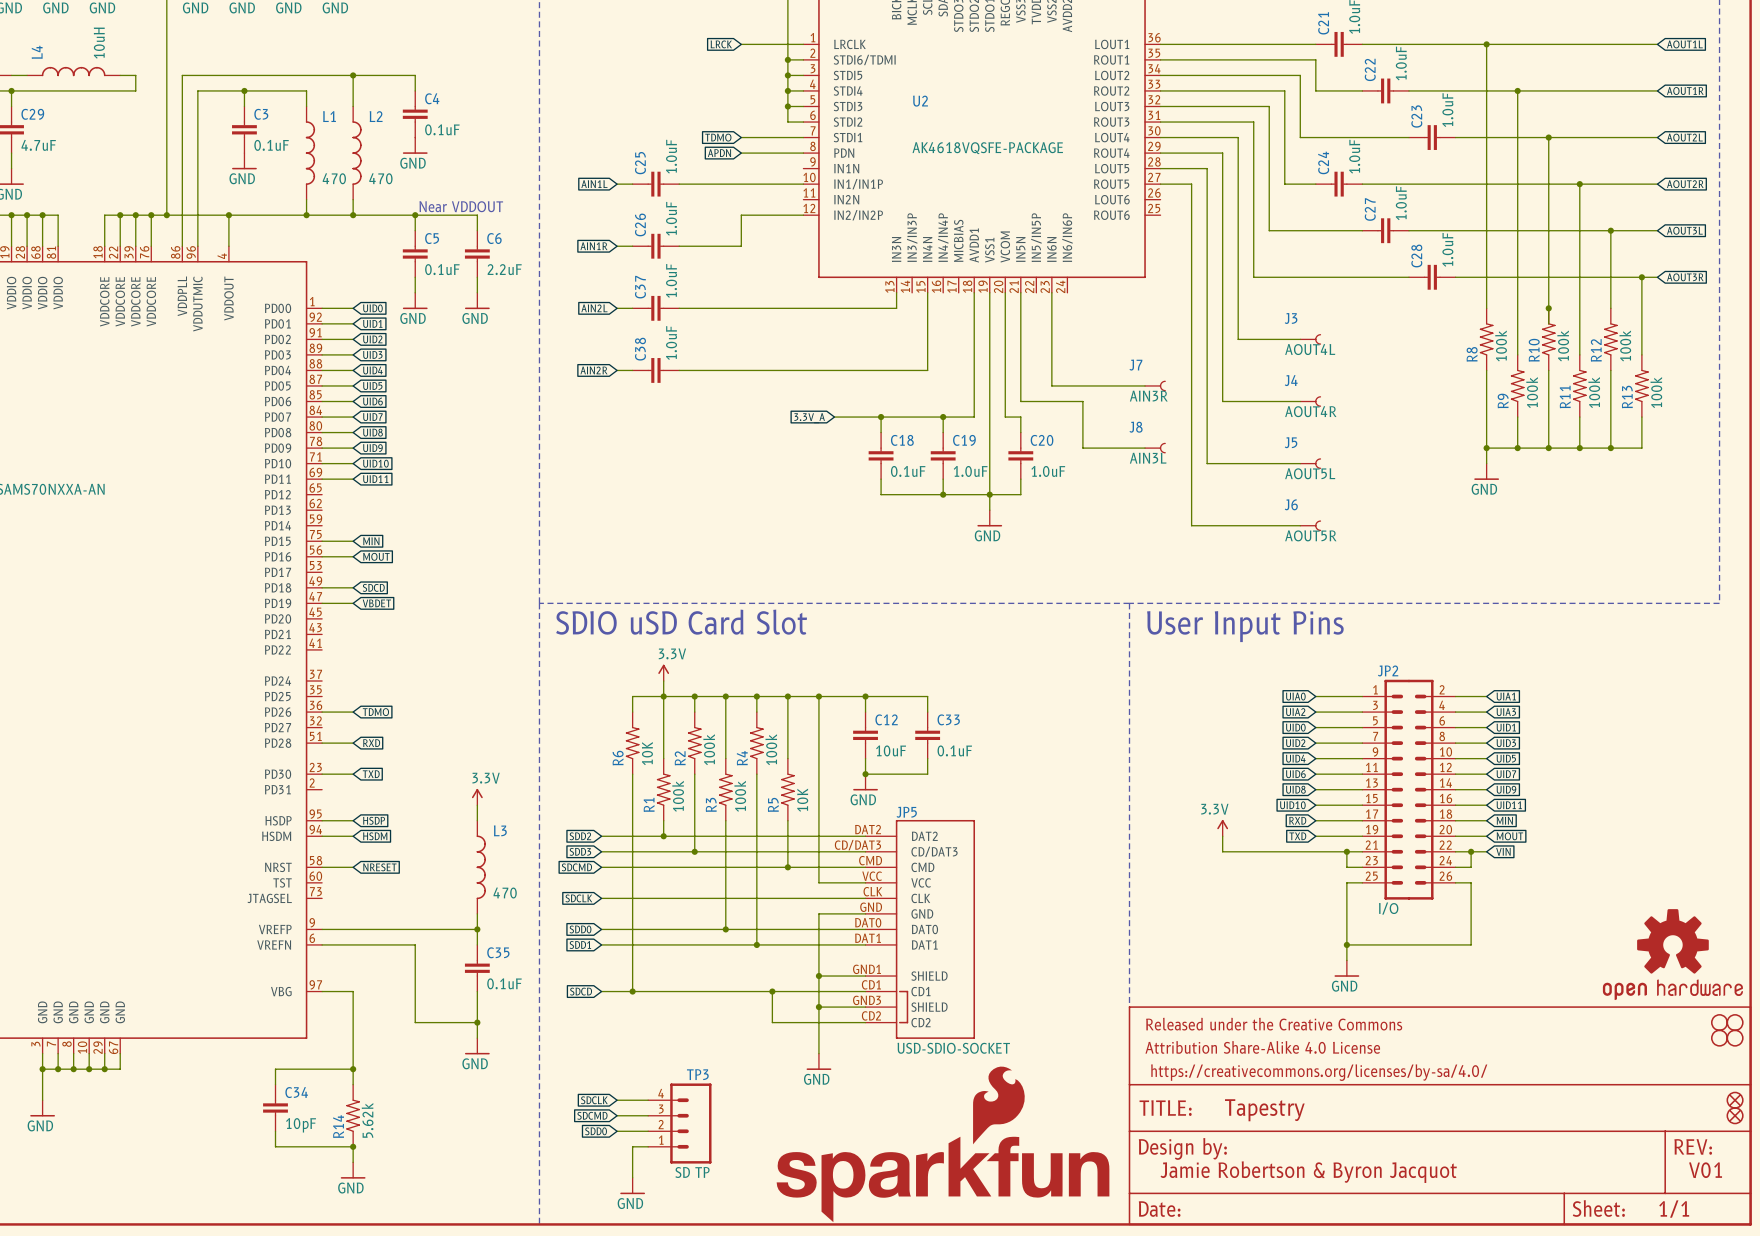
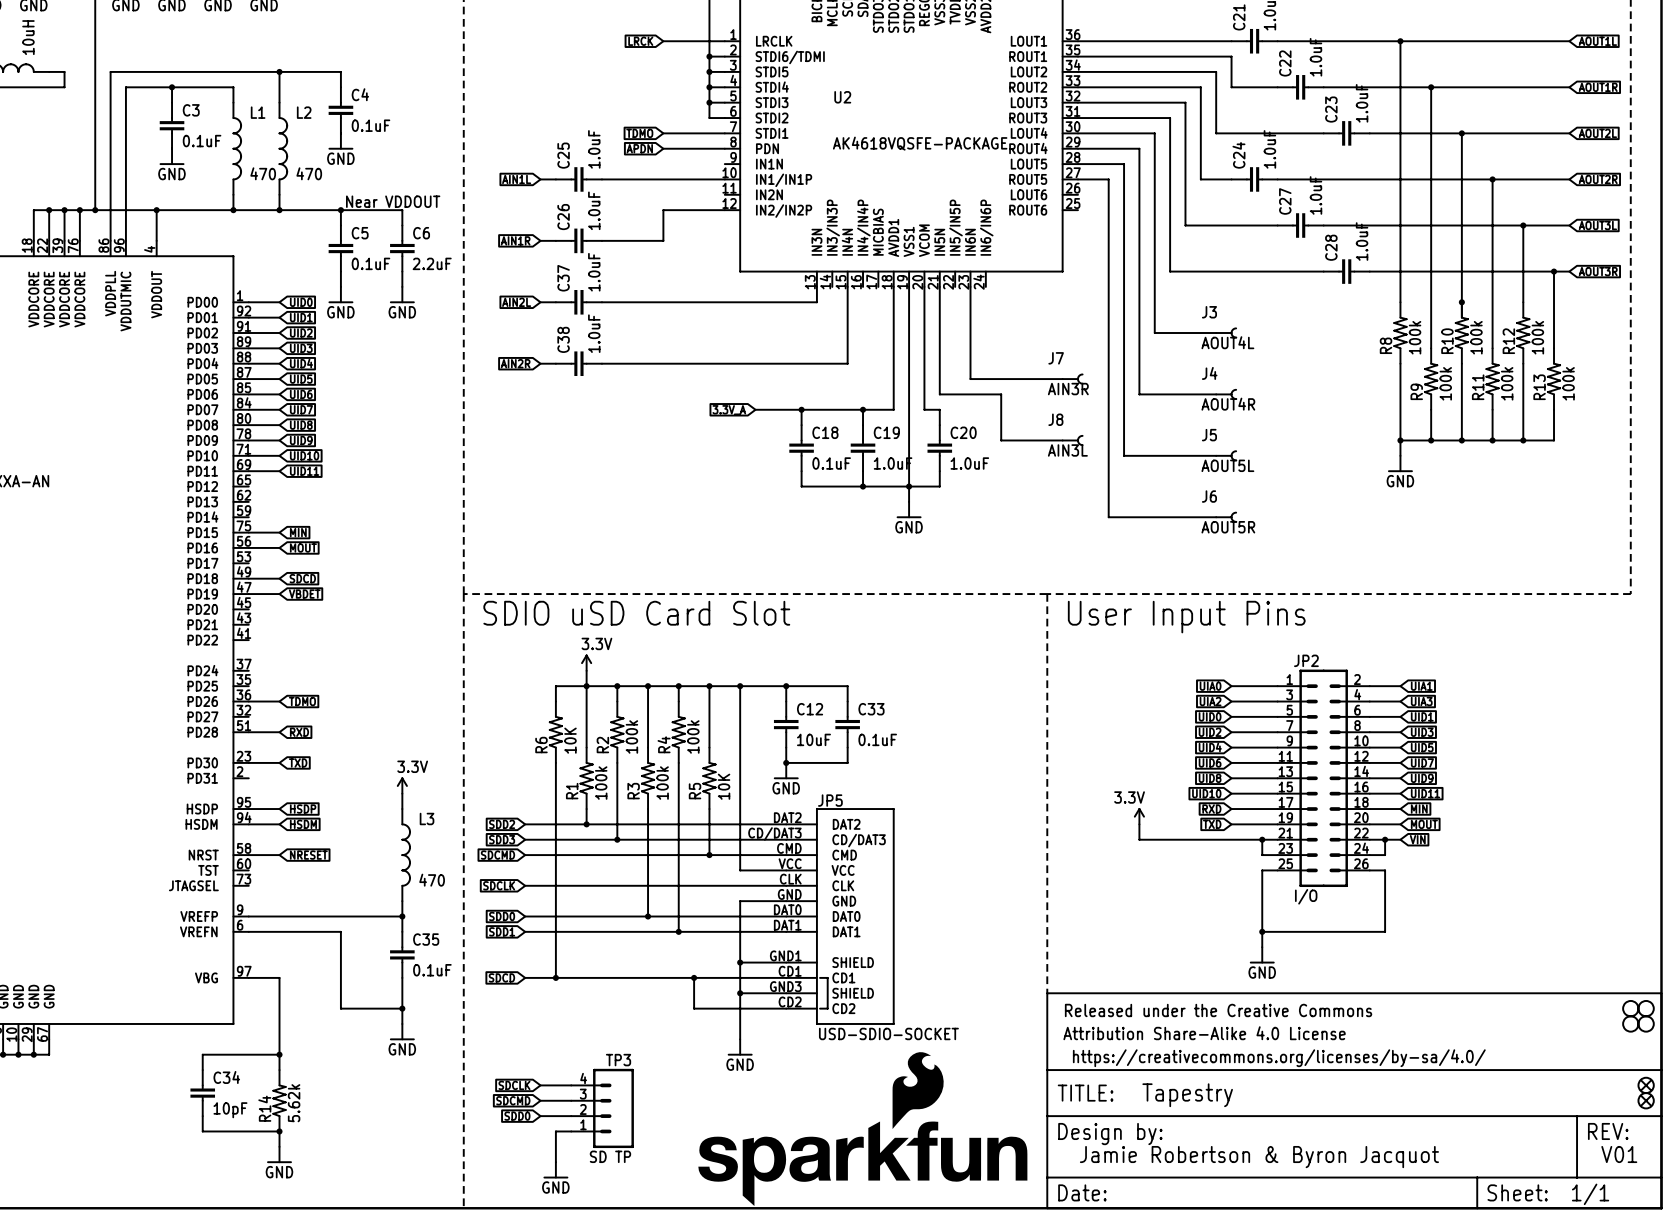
part: (1672, 954) -> none

